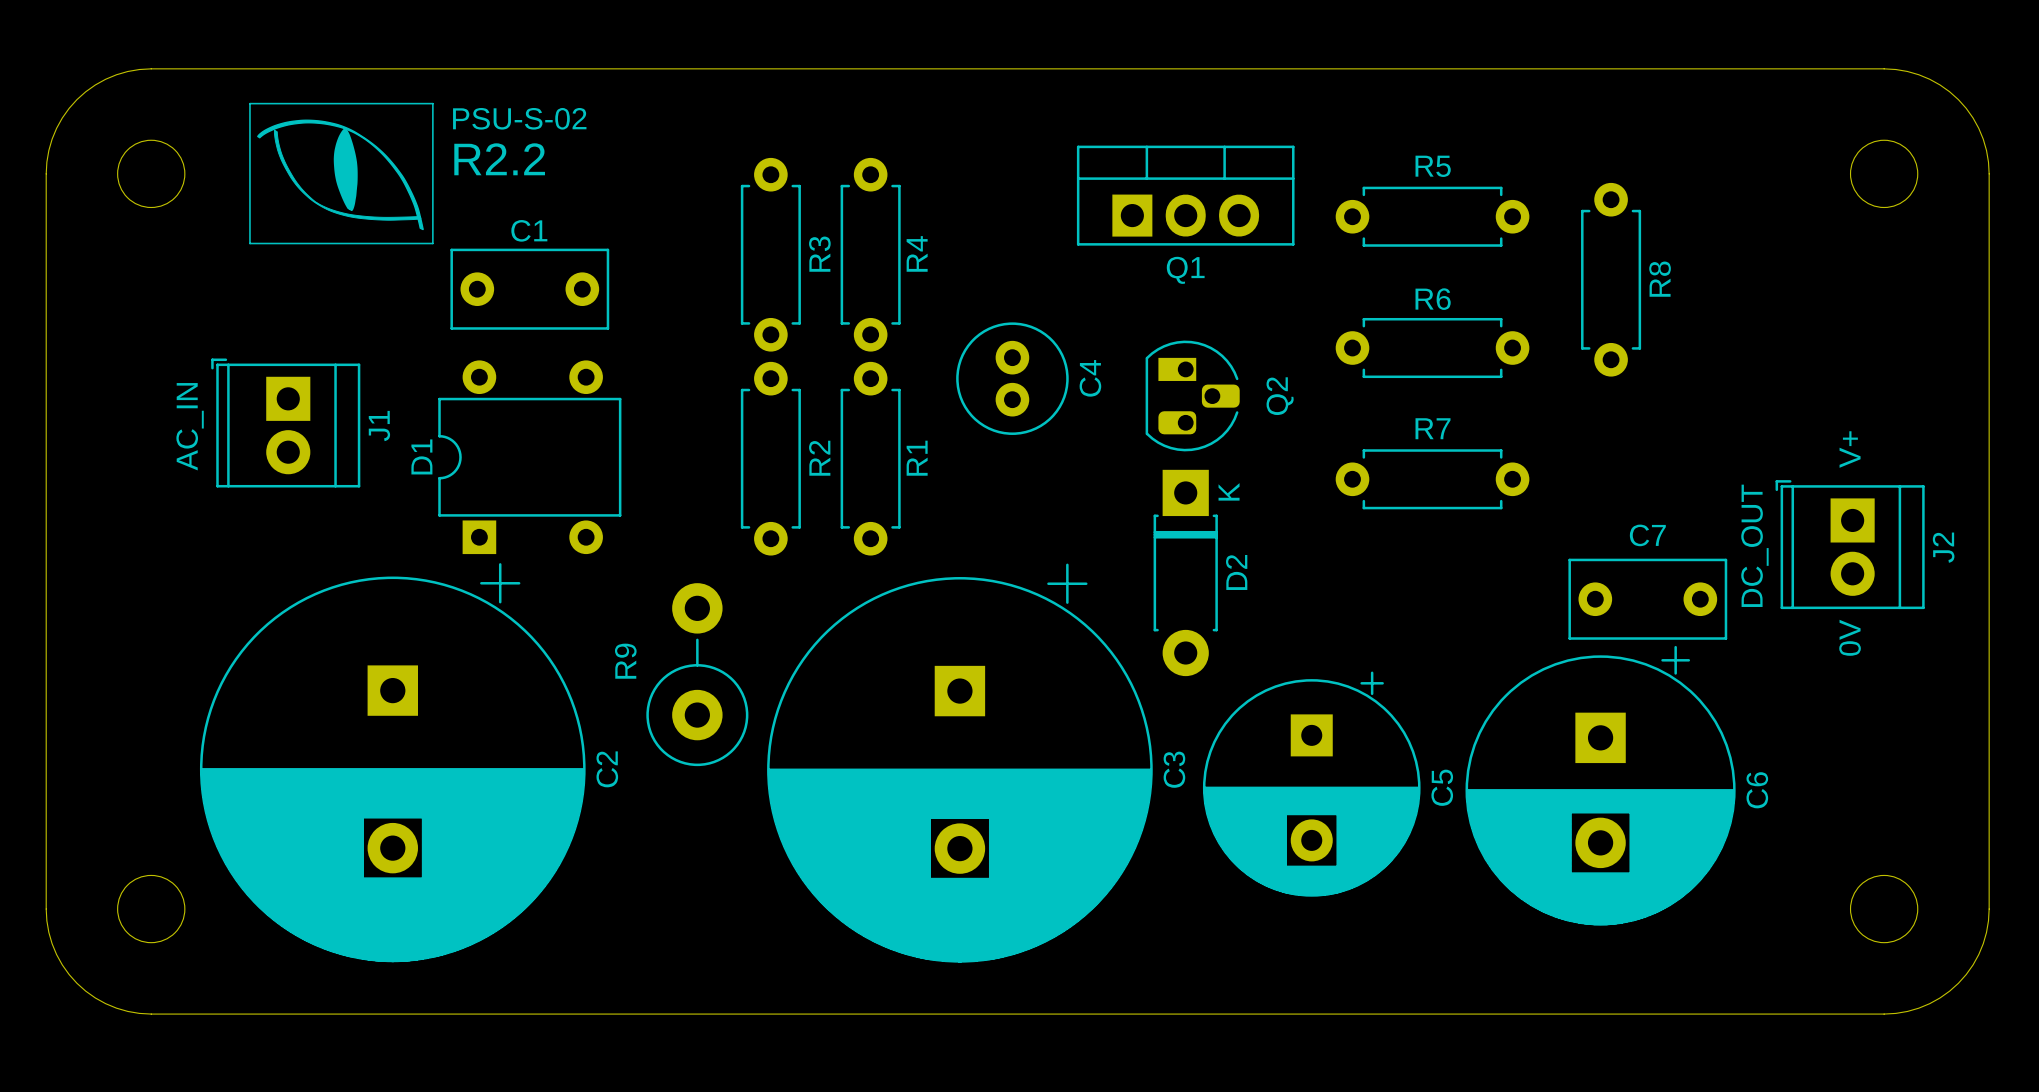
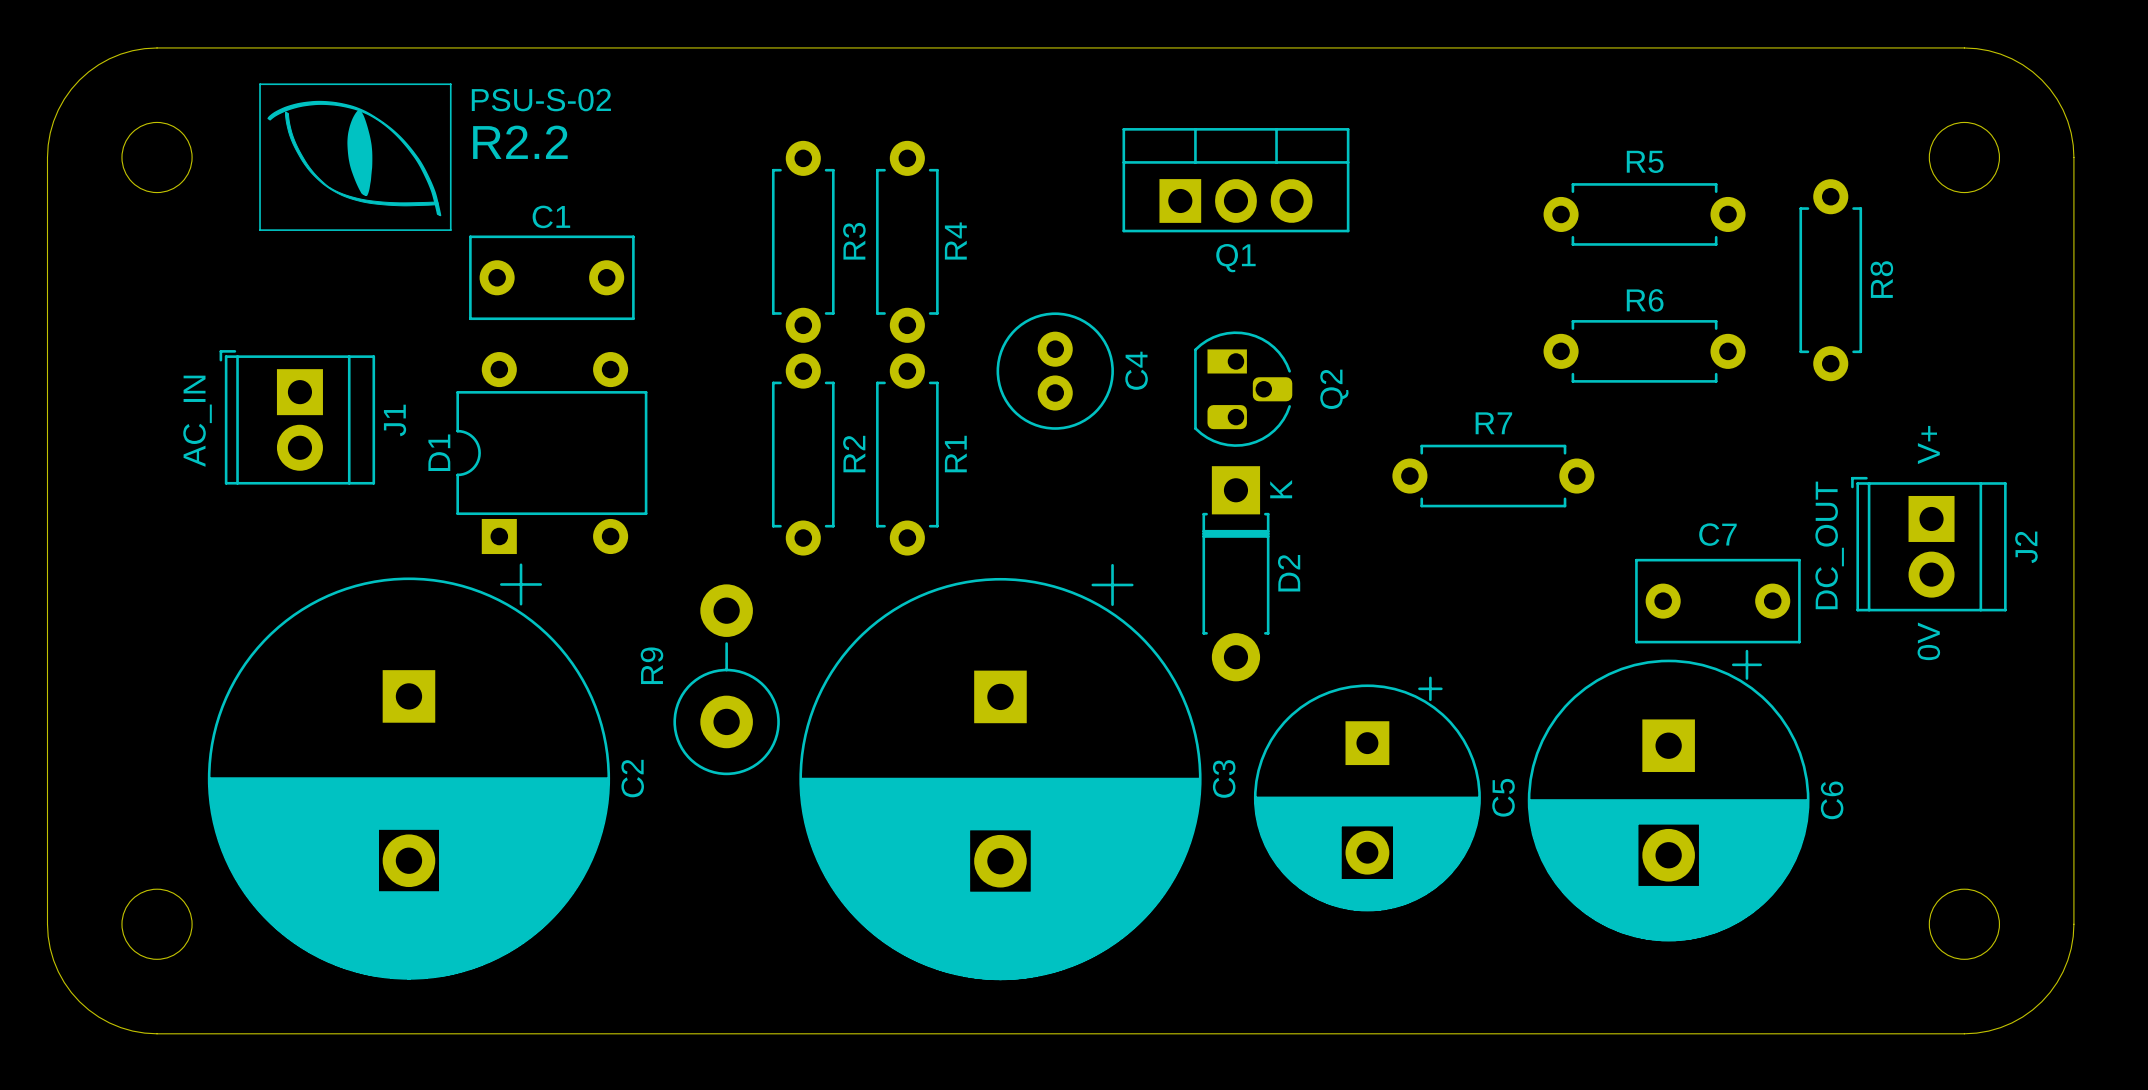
R5 position: (1432, 216) -> (1644, 214)
R8 position: (1611, 279) -> (1830, 280)
R6 position: (1432, 348) -> (1644, 351)

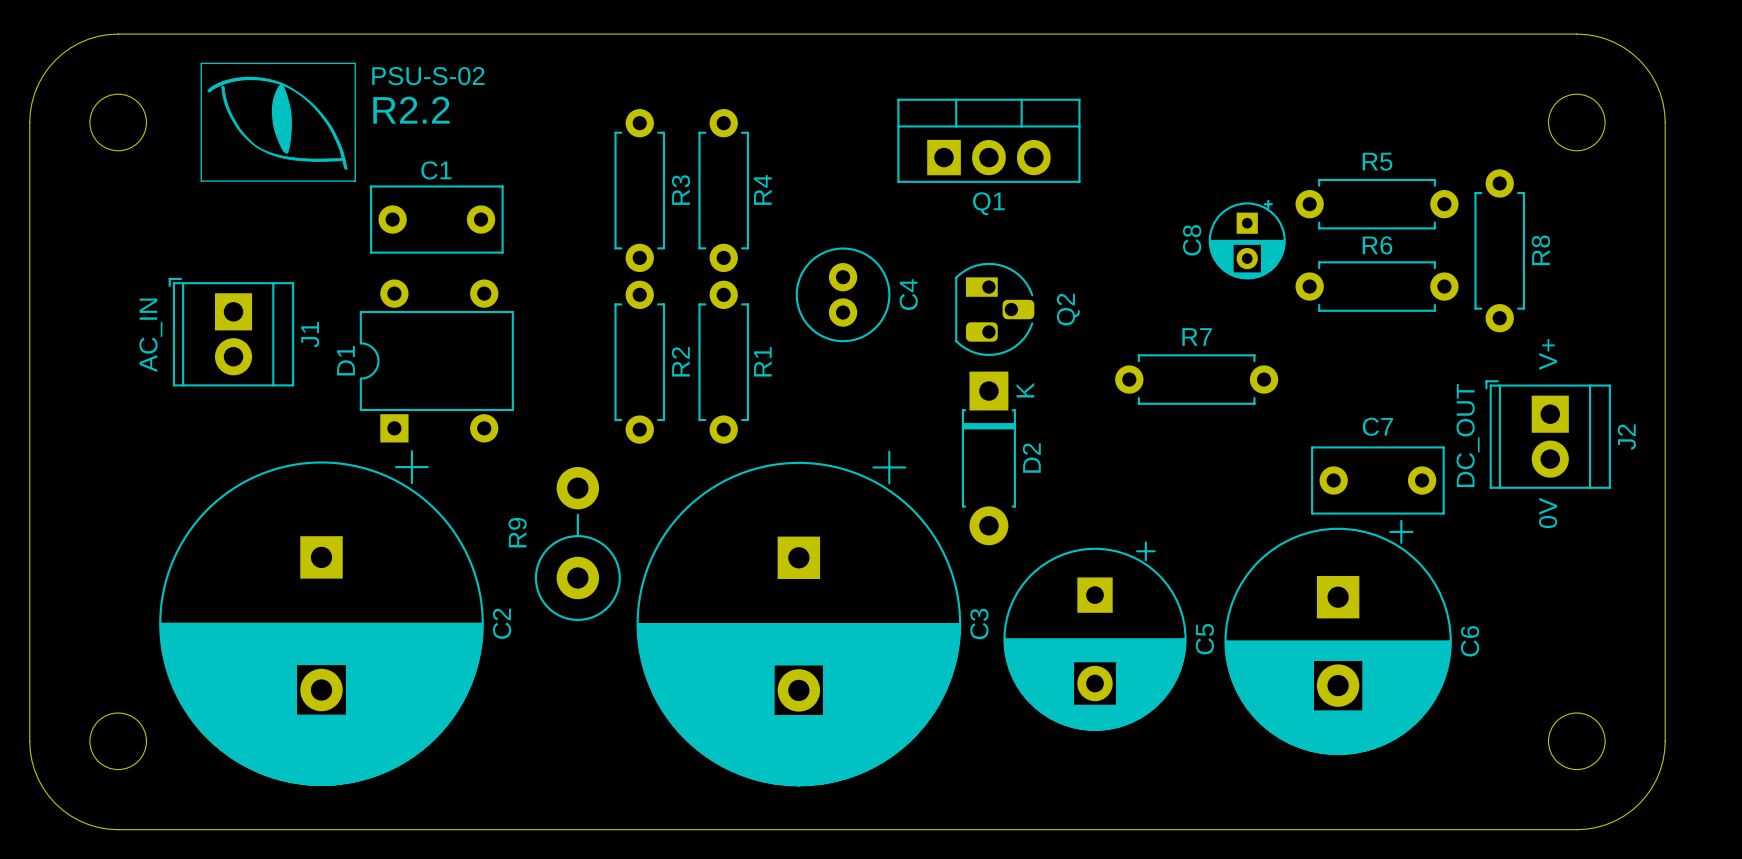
R5 position: (1644, 214) -> (1377, 204)
R8 position: (1830, 280) -> (1499, 250)
C8: none -> (1247, 239)
R6 position: (1644, 351) -> (1377, 286)

